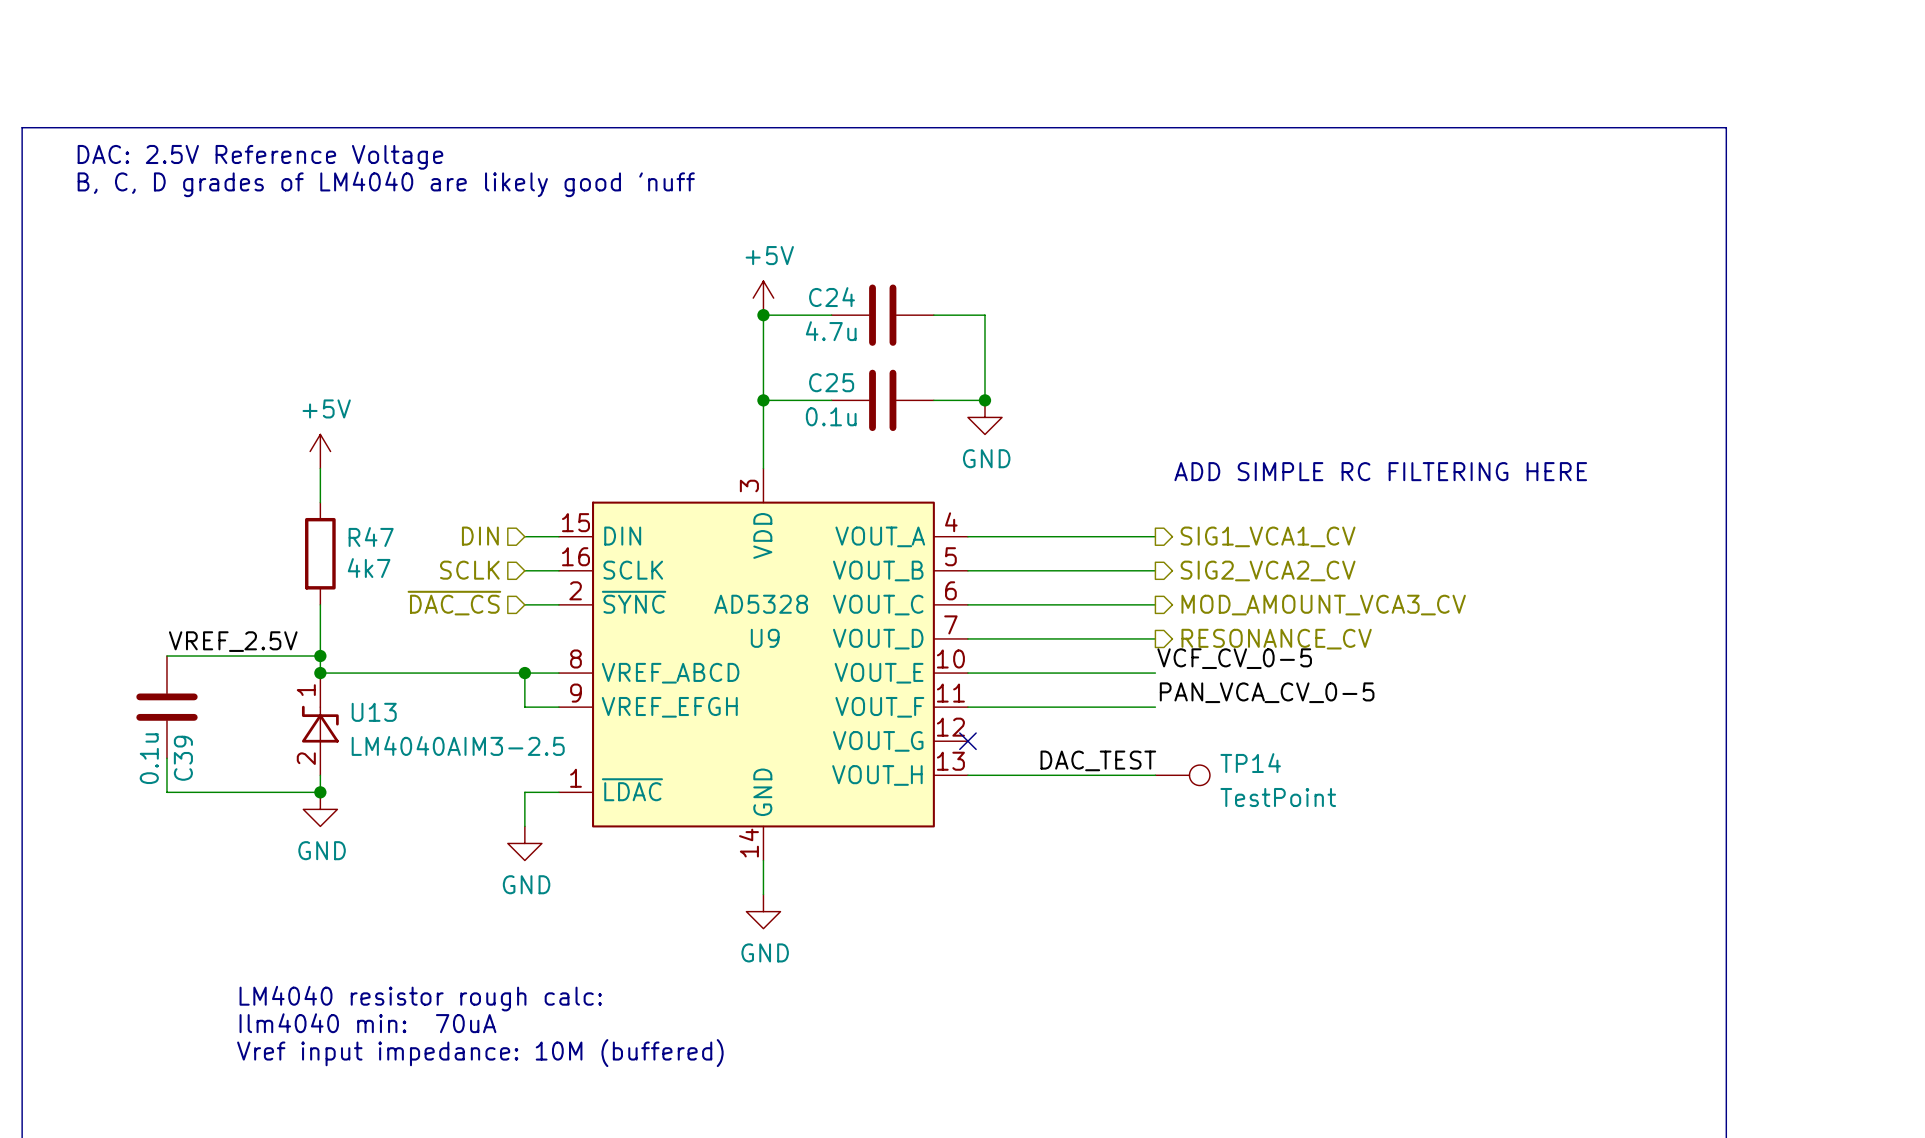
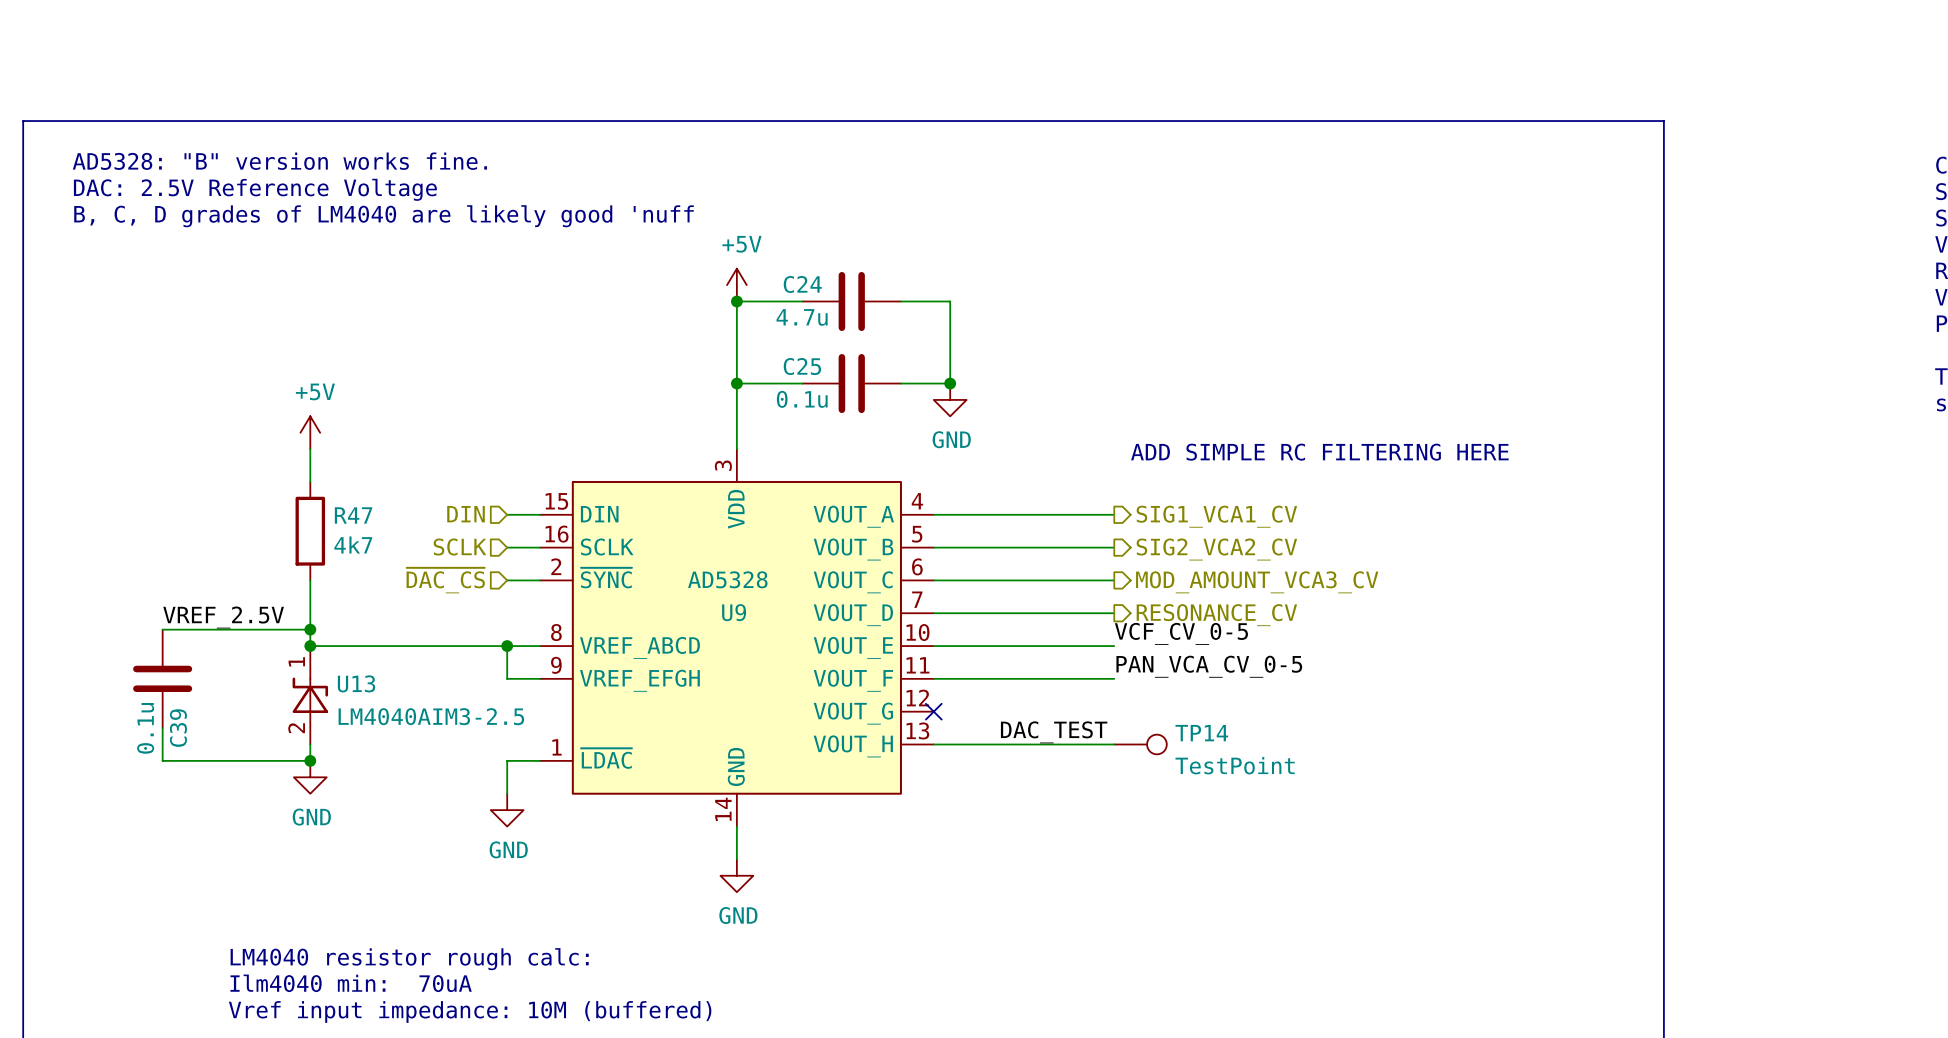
text position: DAC: 2.5V Reference Voltage (260, 157) -> DAC: 2.5V Reference Voltage (255, 189)
text: none -> AD5328: "B" version works fine. (279, 161)
text position: B, C, D grades of LM4040 are likely good 'nuff (386, 184) -> B, C, D grades of LM4040 are likely good 'nuff (384, 216)

